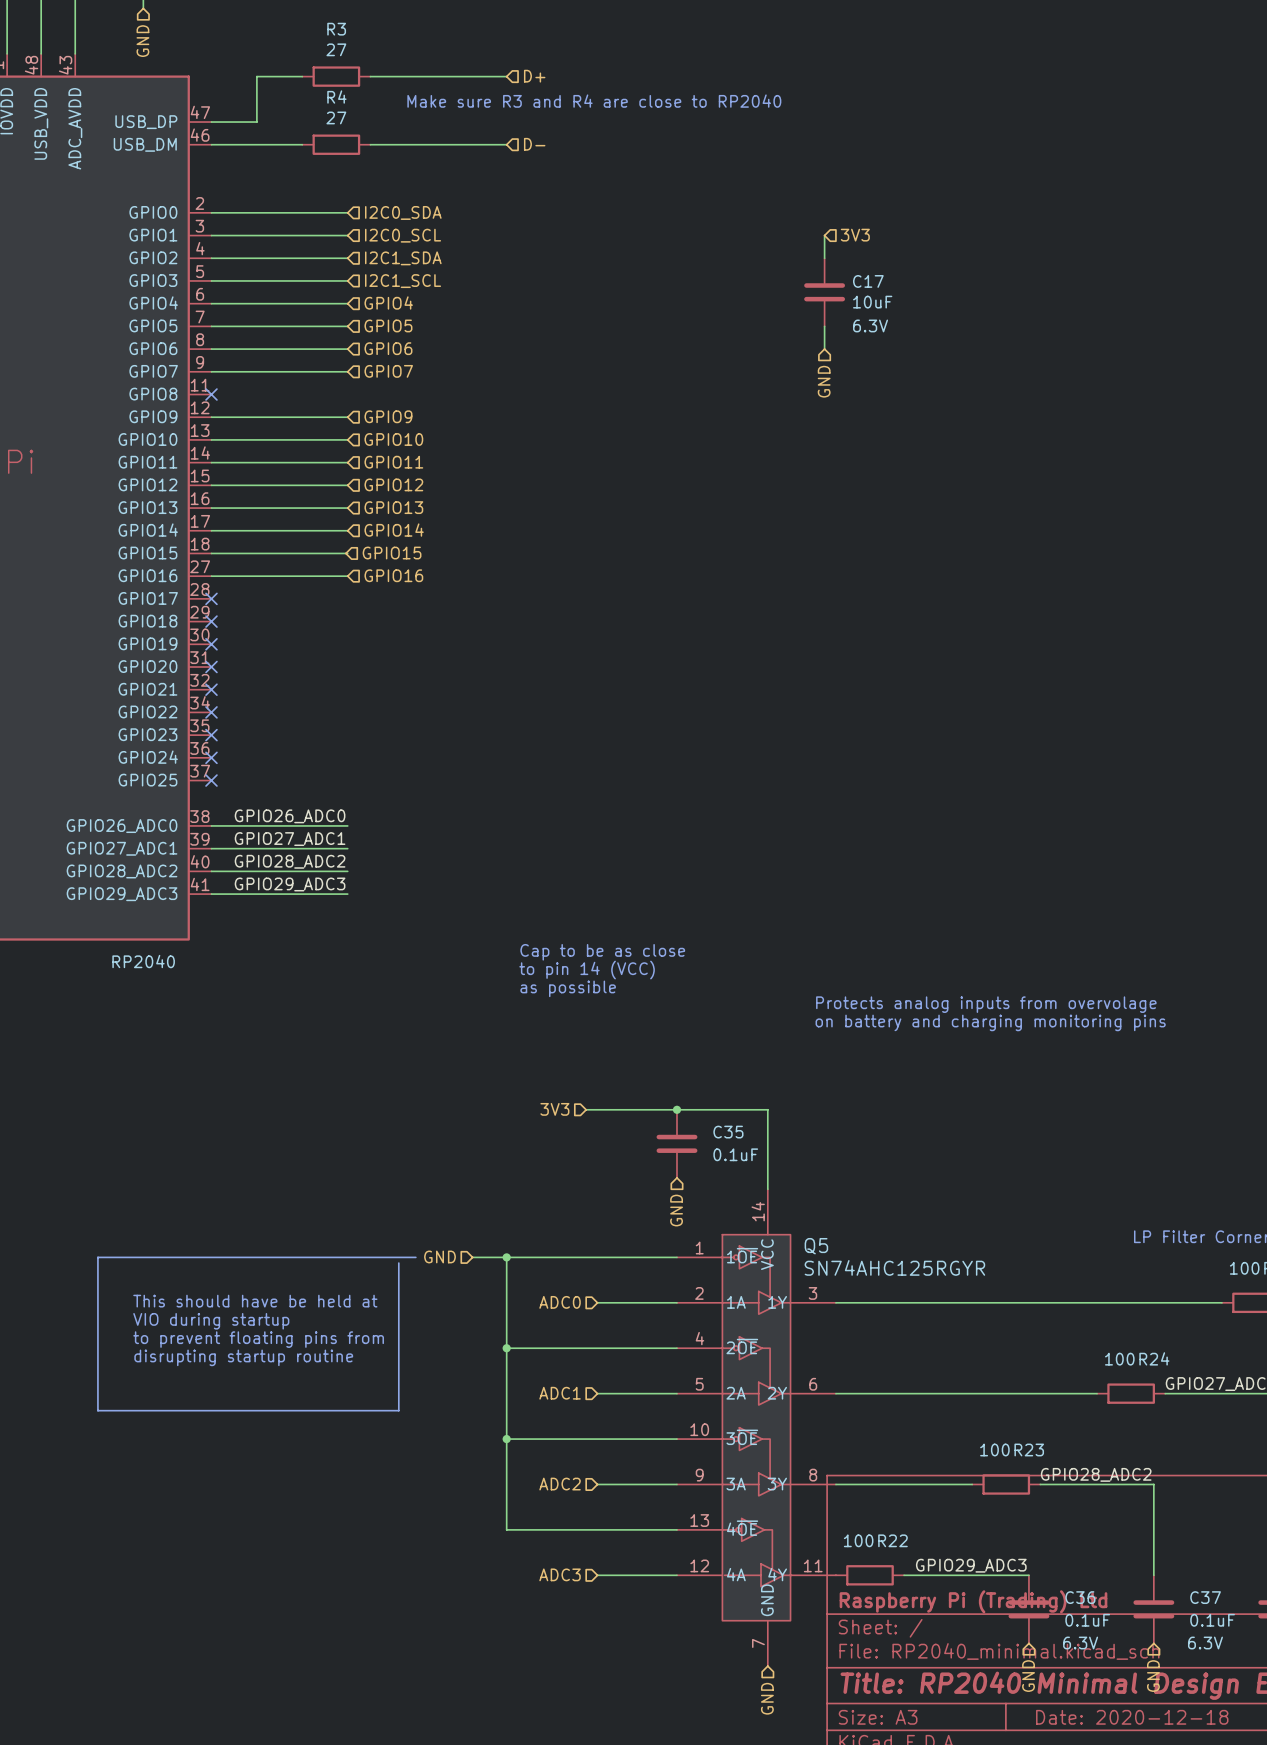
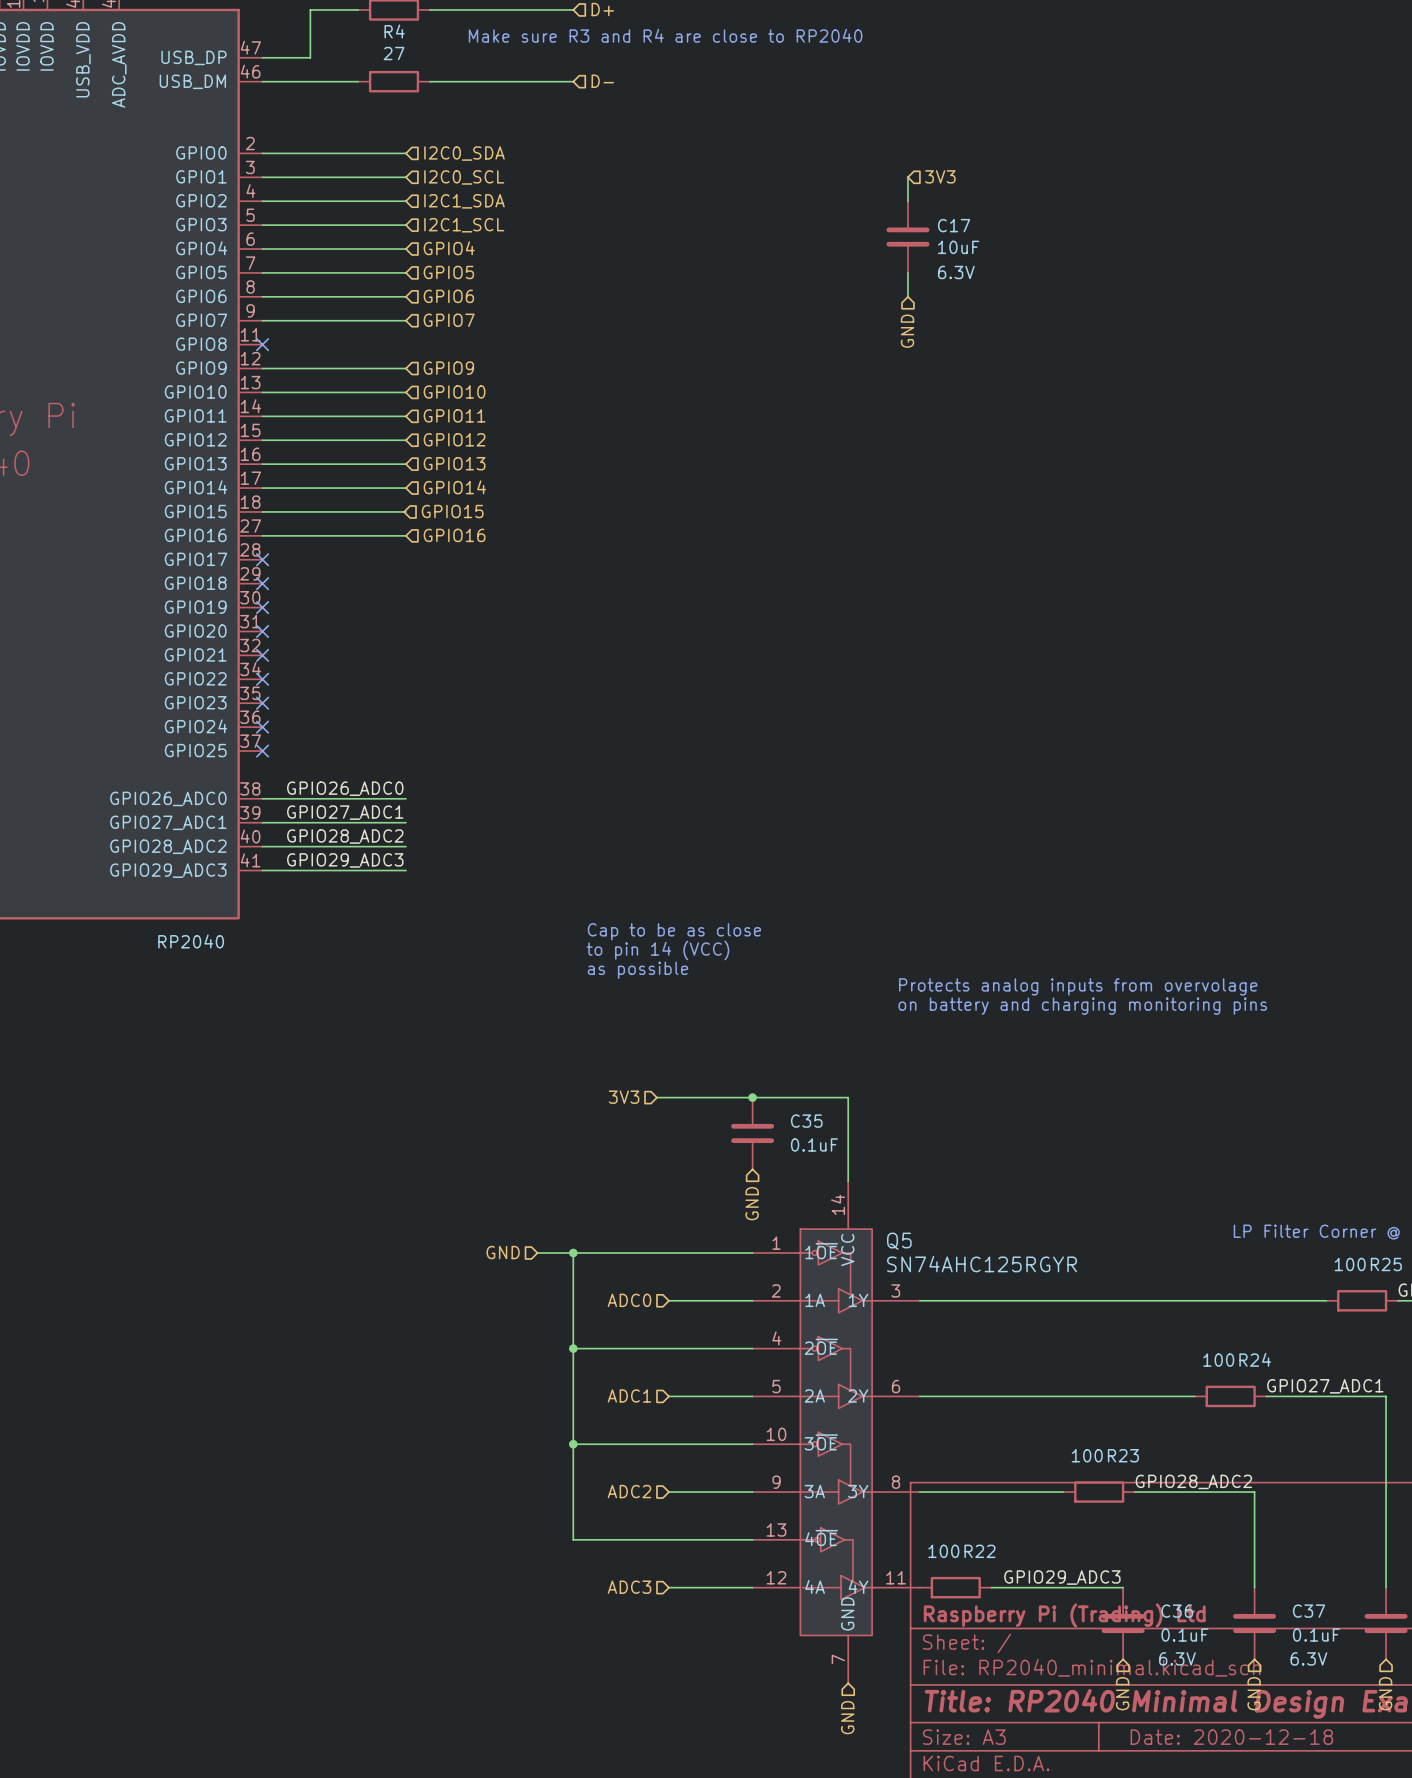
line: (415, 1257) (97, 1257) (97, 1410) (398, 1410) (398, 1263) -> none
text: This should have be held at (255, 1301) -> none
text: VIO during startup (211, 1321) -> none
text: to prevent floating pins from (258, 1339) -> none
text: disrupting startup routine (243, 1357) -> none

